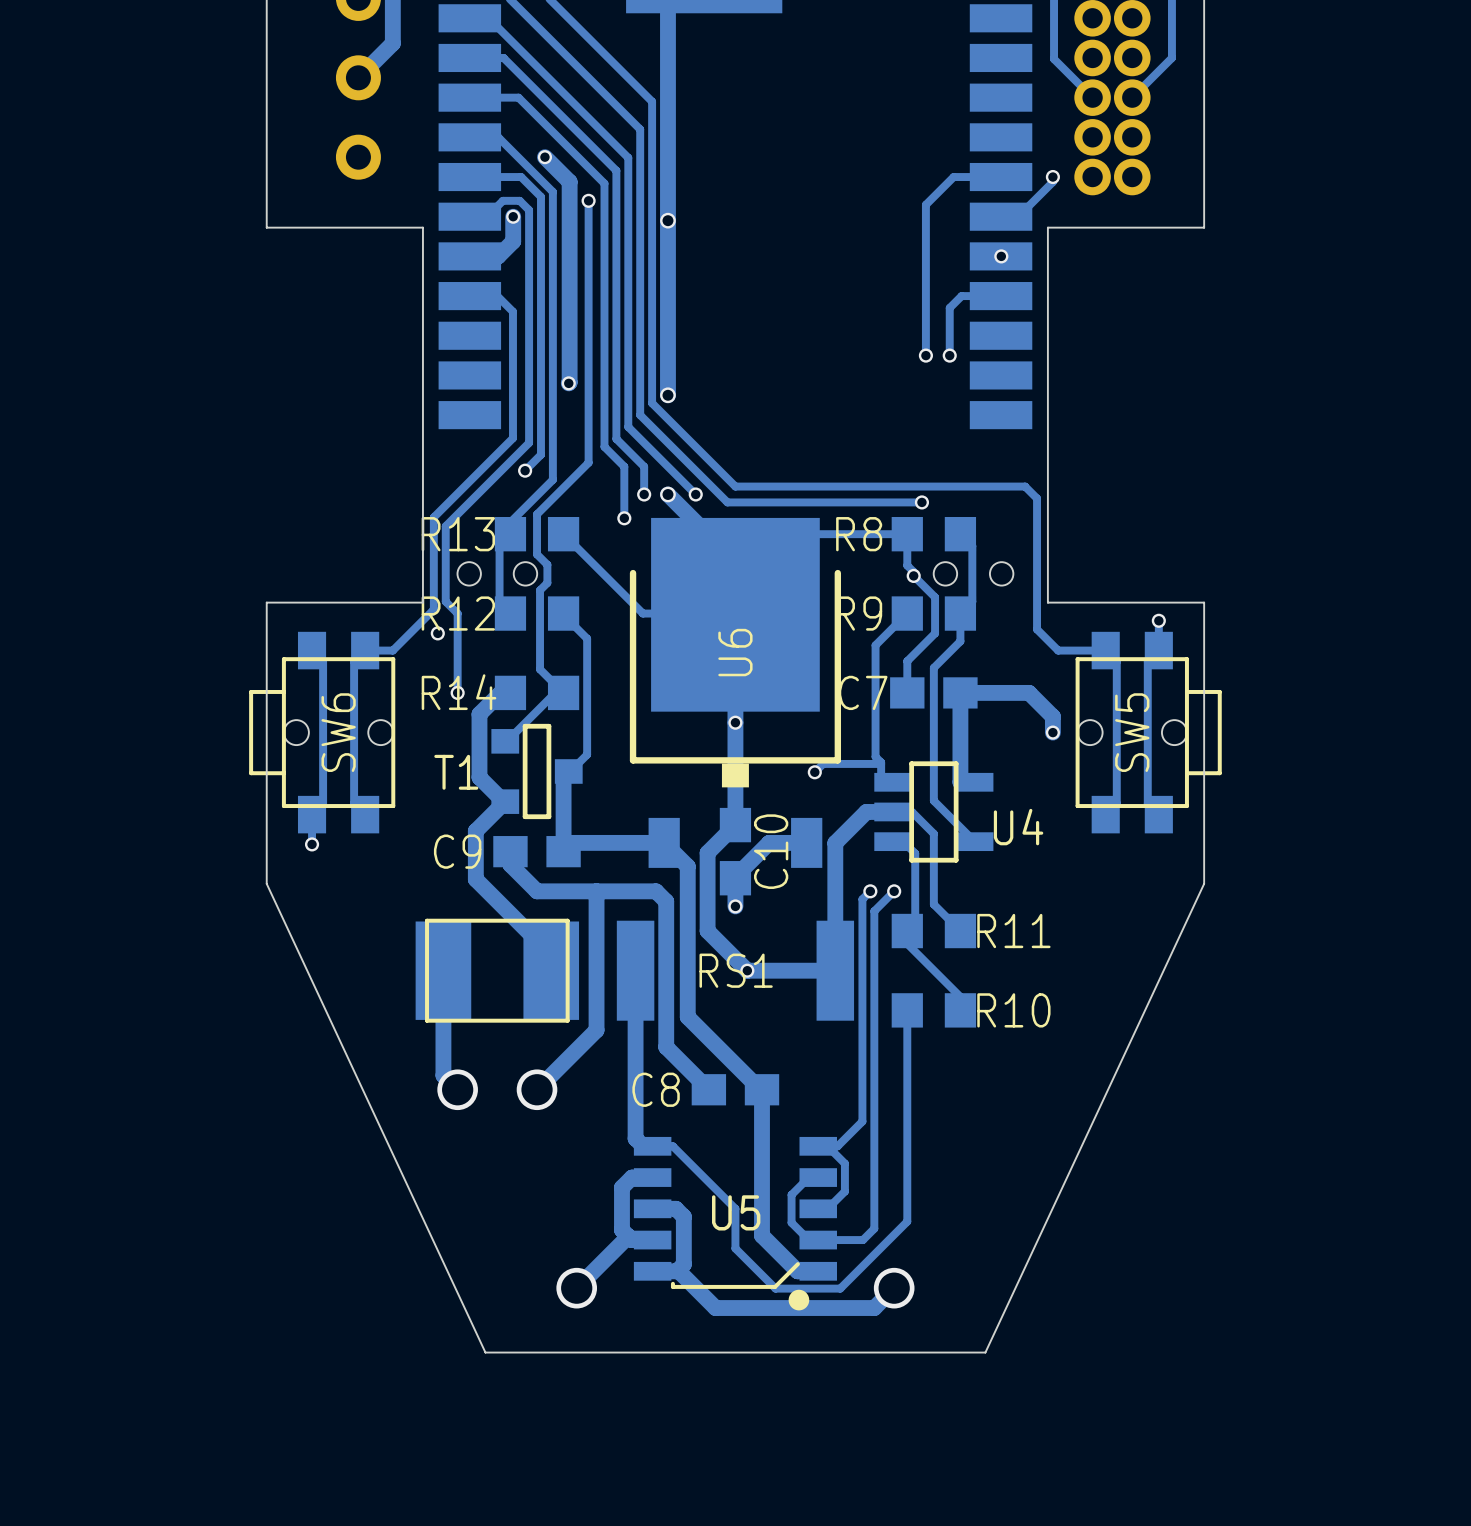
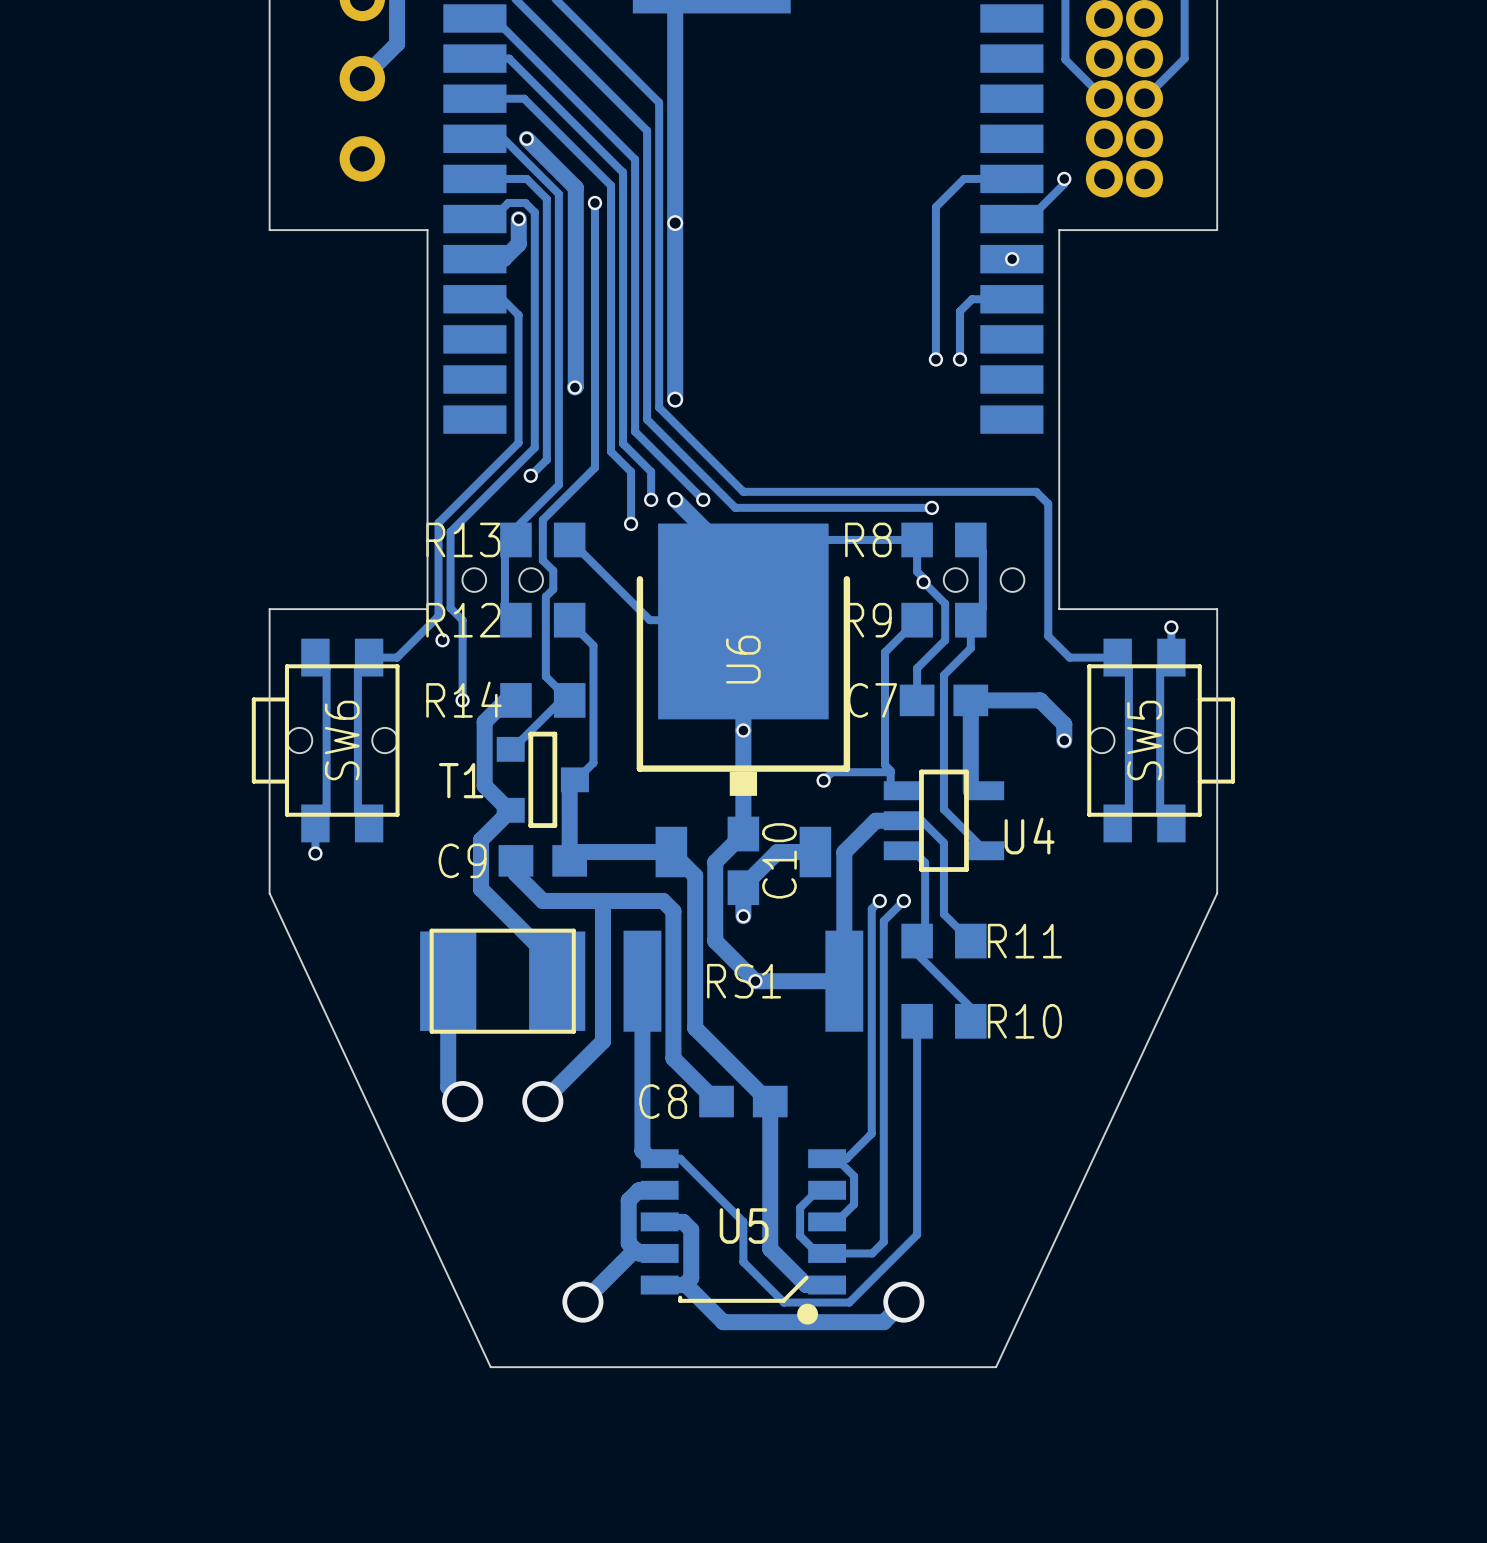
track: (544, 157) (569, 181) (569, 185) -> (526, 138) (575, 187)
via position: (544, 157) -> (526, 138)

